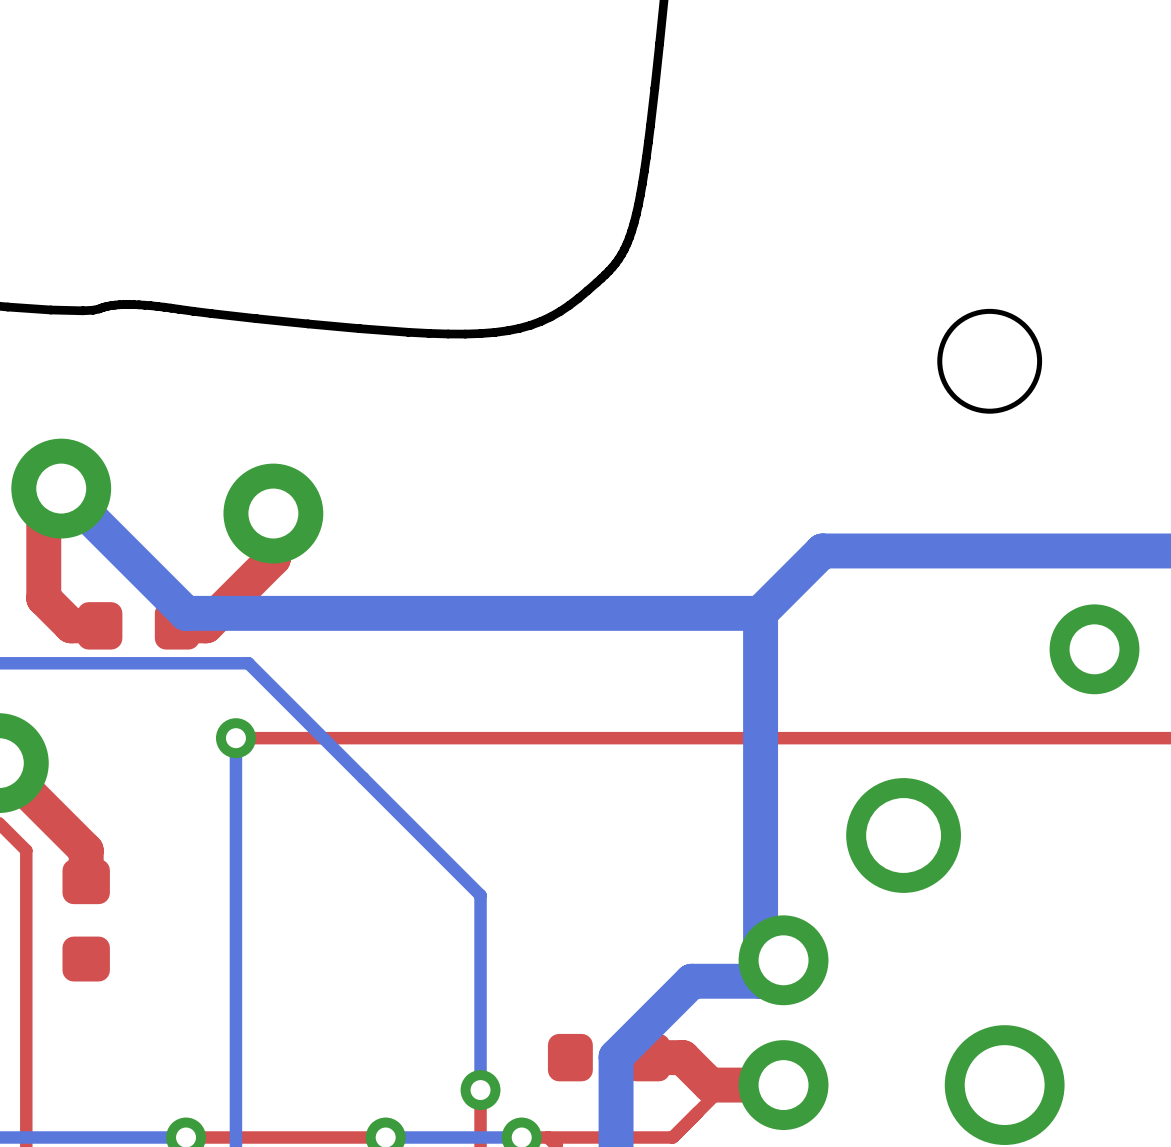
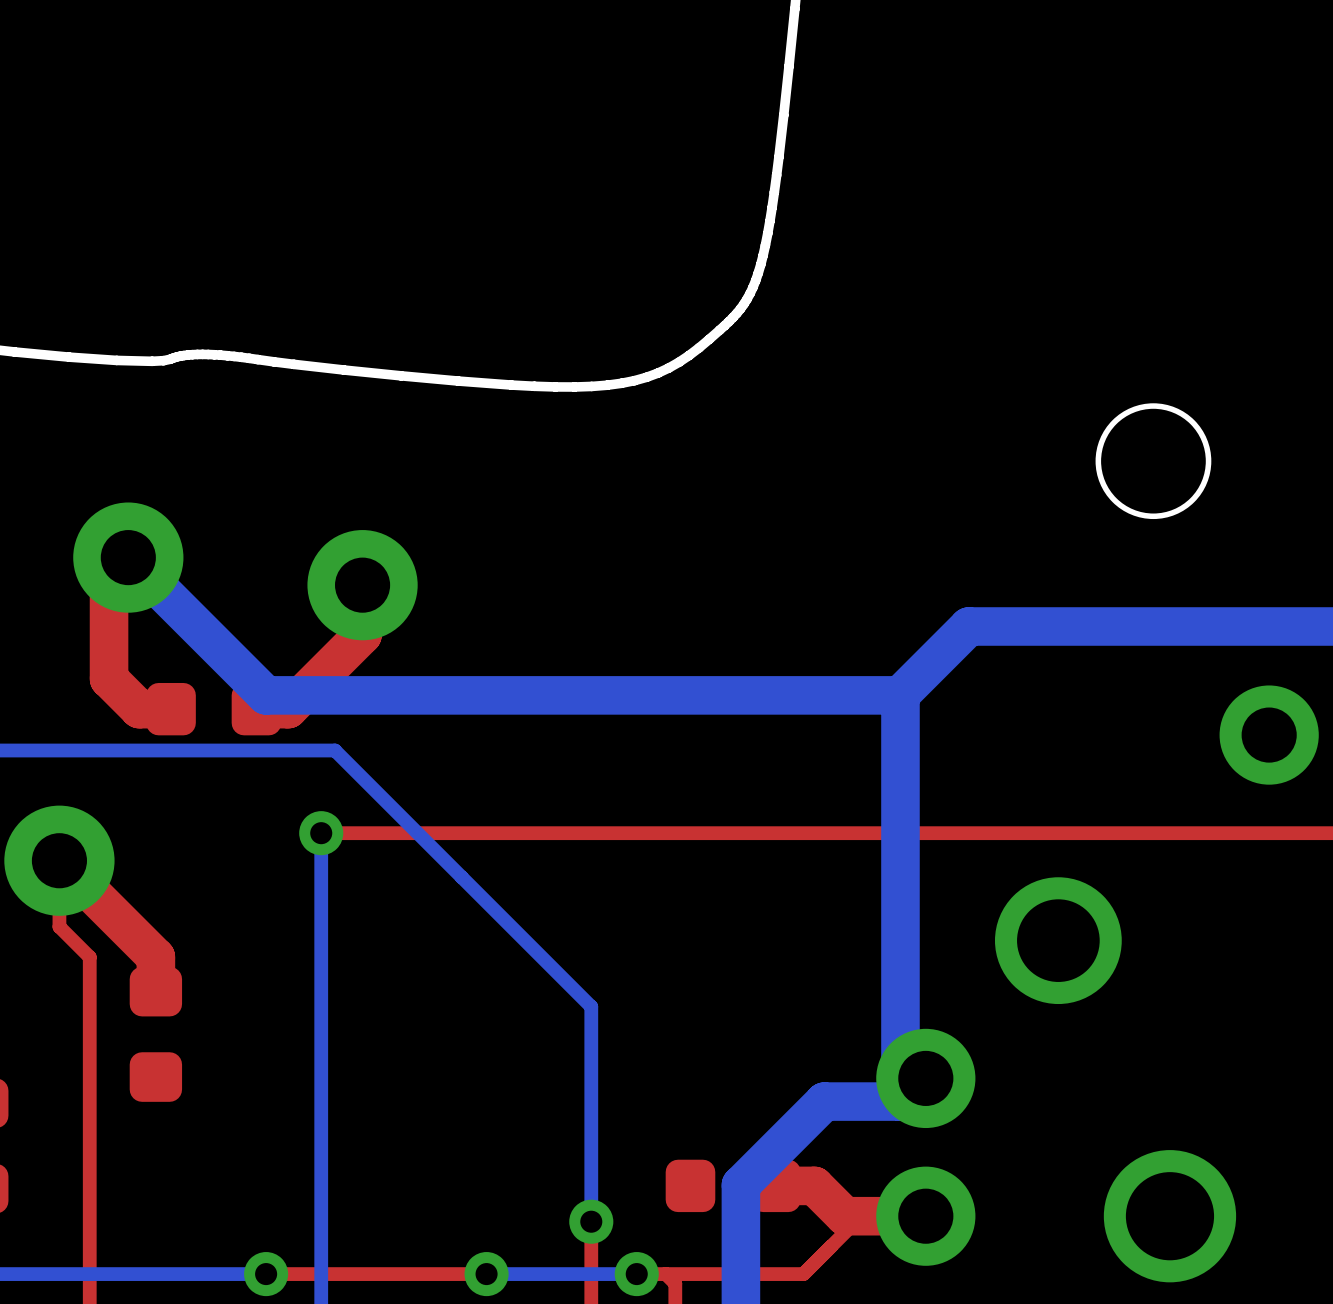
round board edge position: (989, 361) -> (1153, 461)

